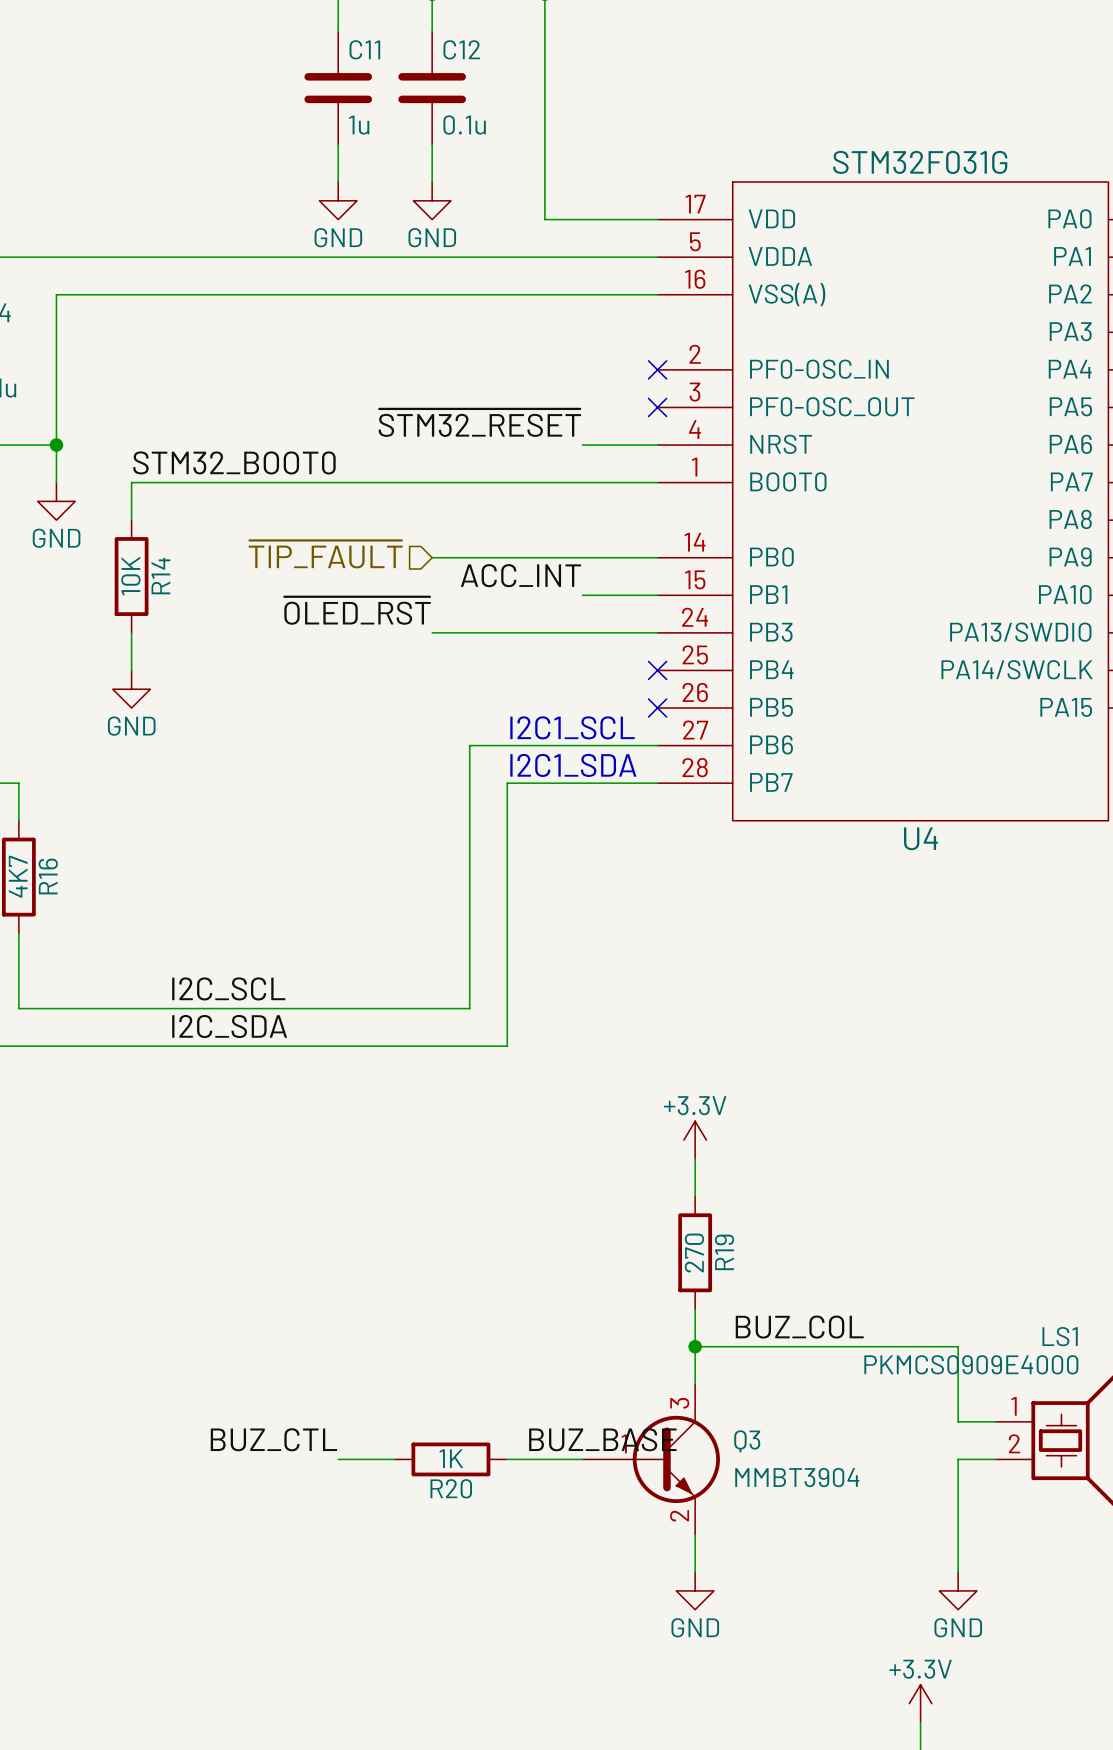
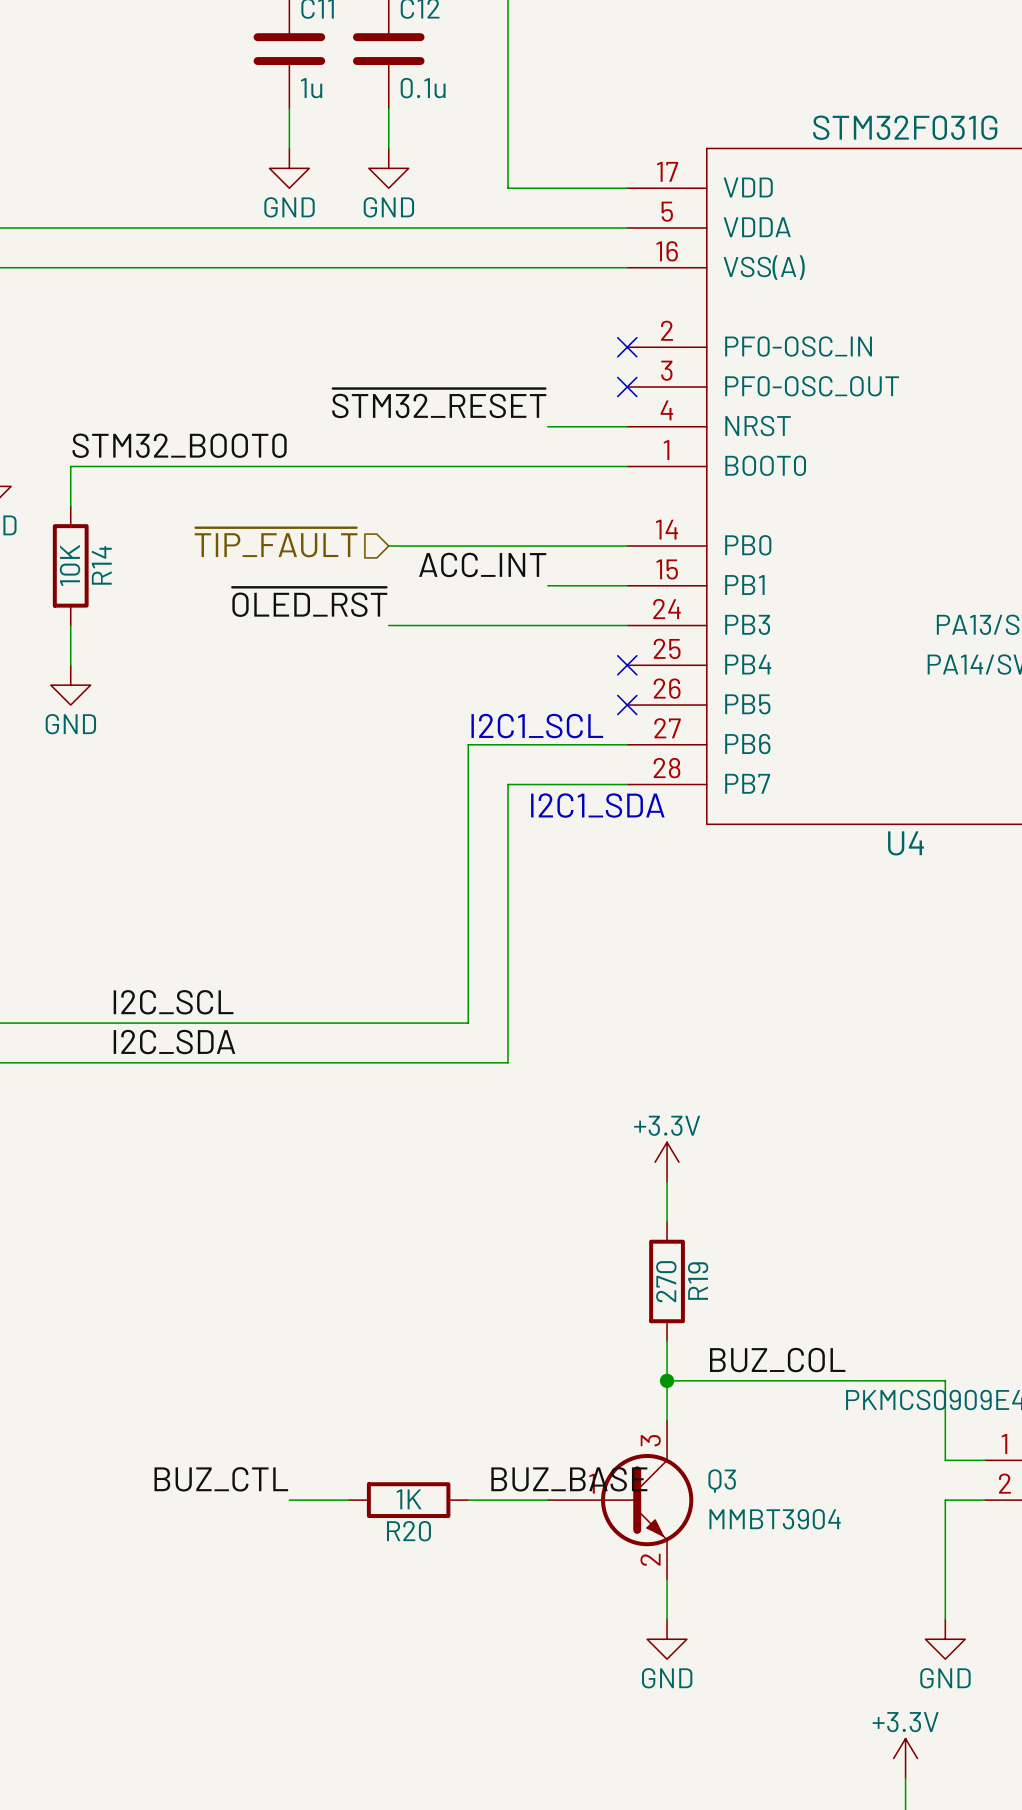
wire: (507, 745) (469, 745) (469, 1008) -> none
text position: I2C1_SDA (573, 765) -> I2C1_SDA (597, 805)
wire: (507, 783) (544, 783) -> (468, 784) (468, 744)
wire: none -> (508, 784) (508, 1062) (468, 1062)
wire: (507, 1008) (507, 1046) -> (468, 1023) (428, 1023)

